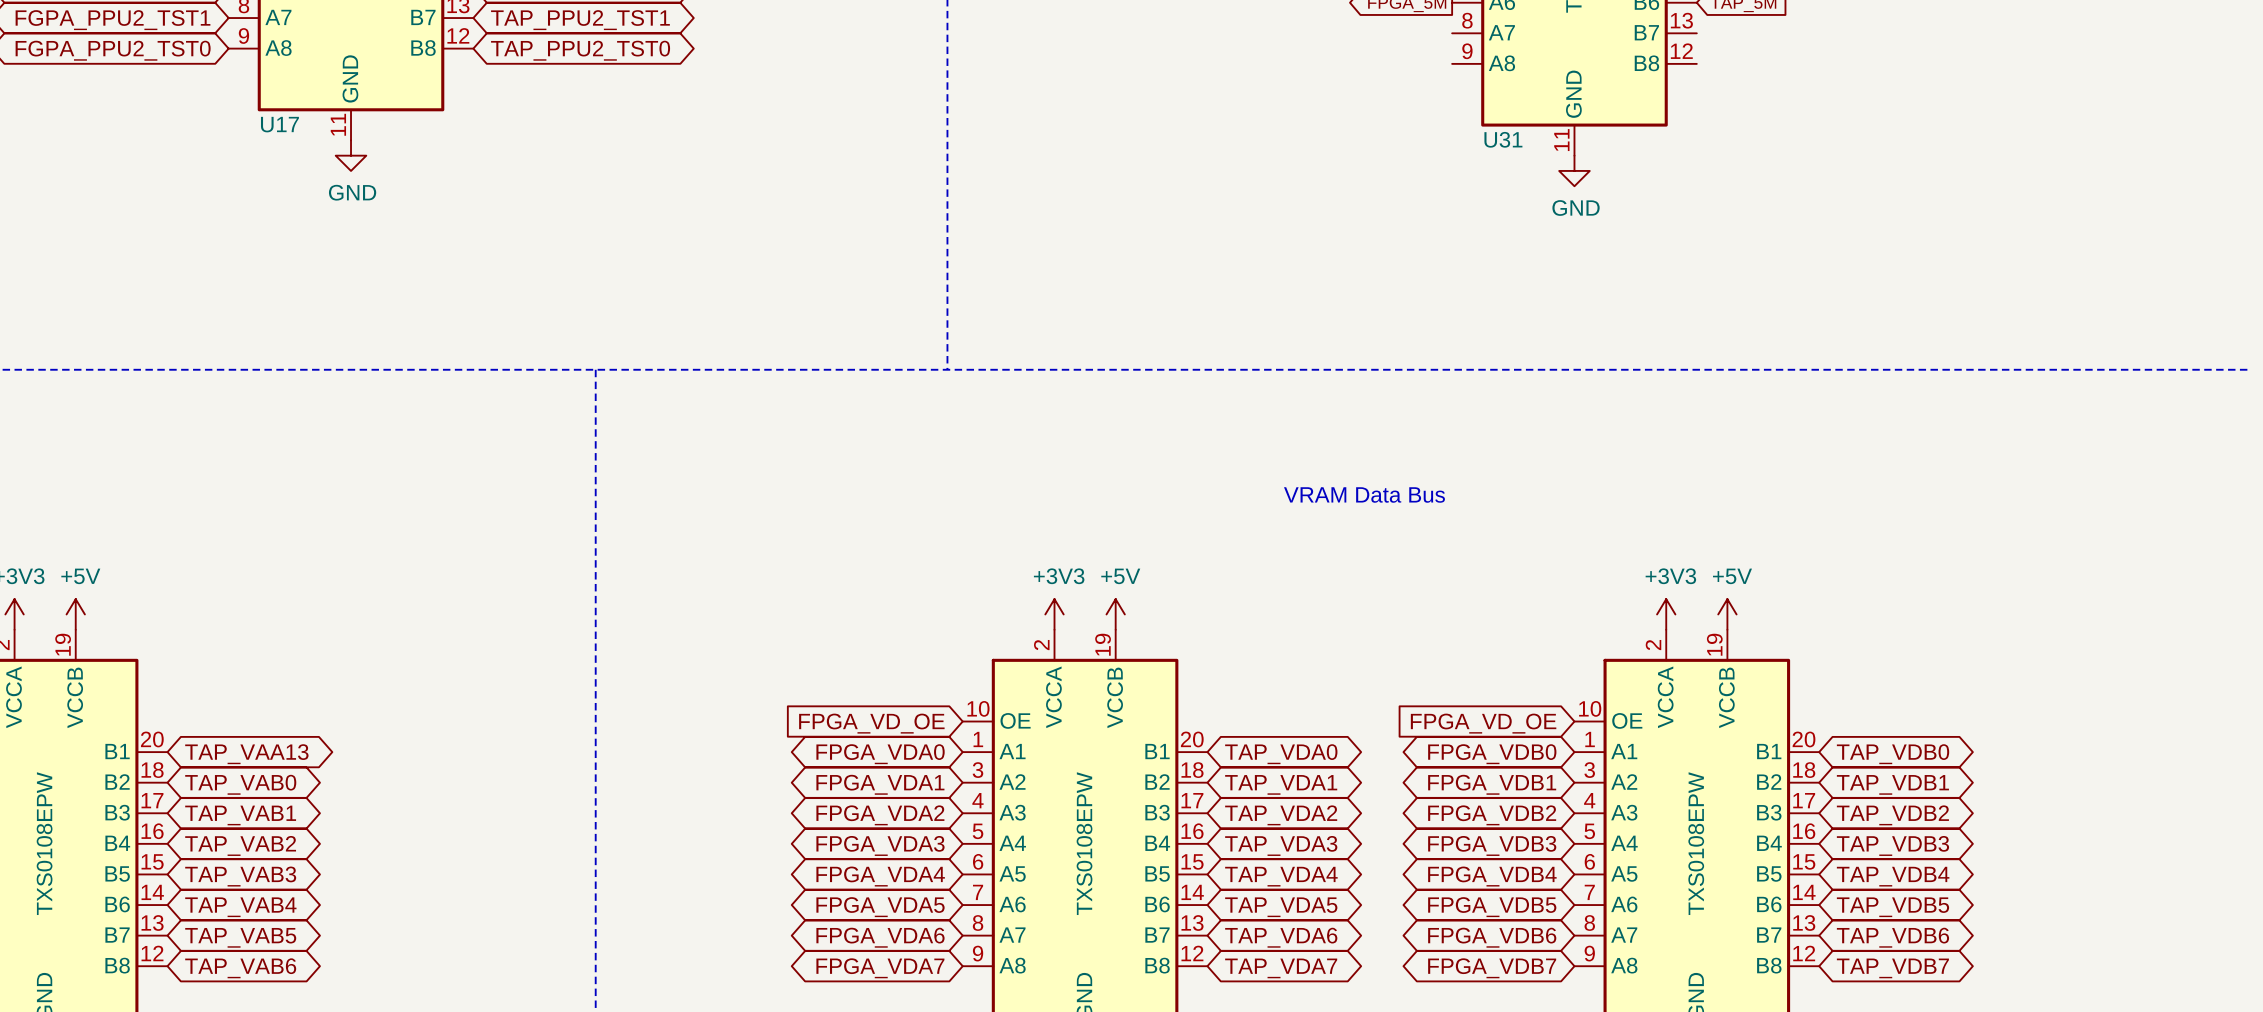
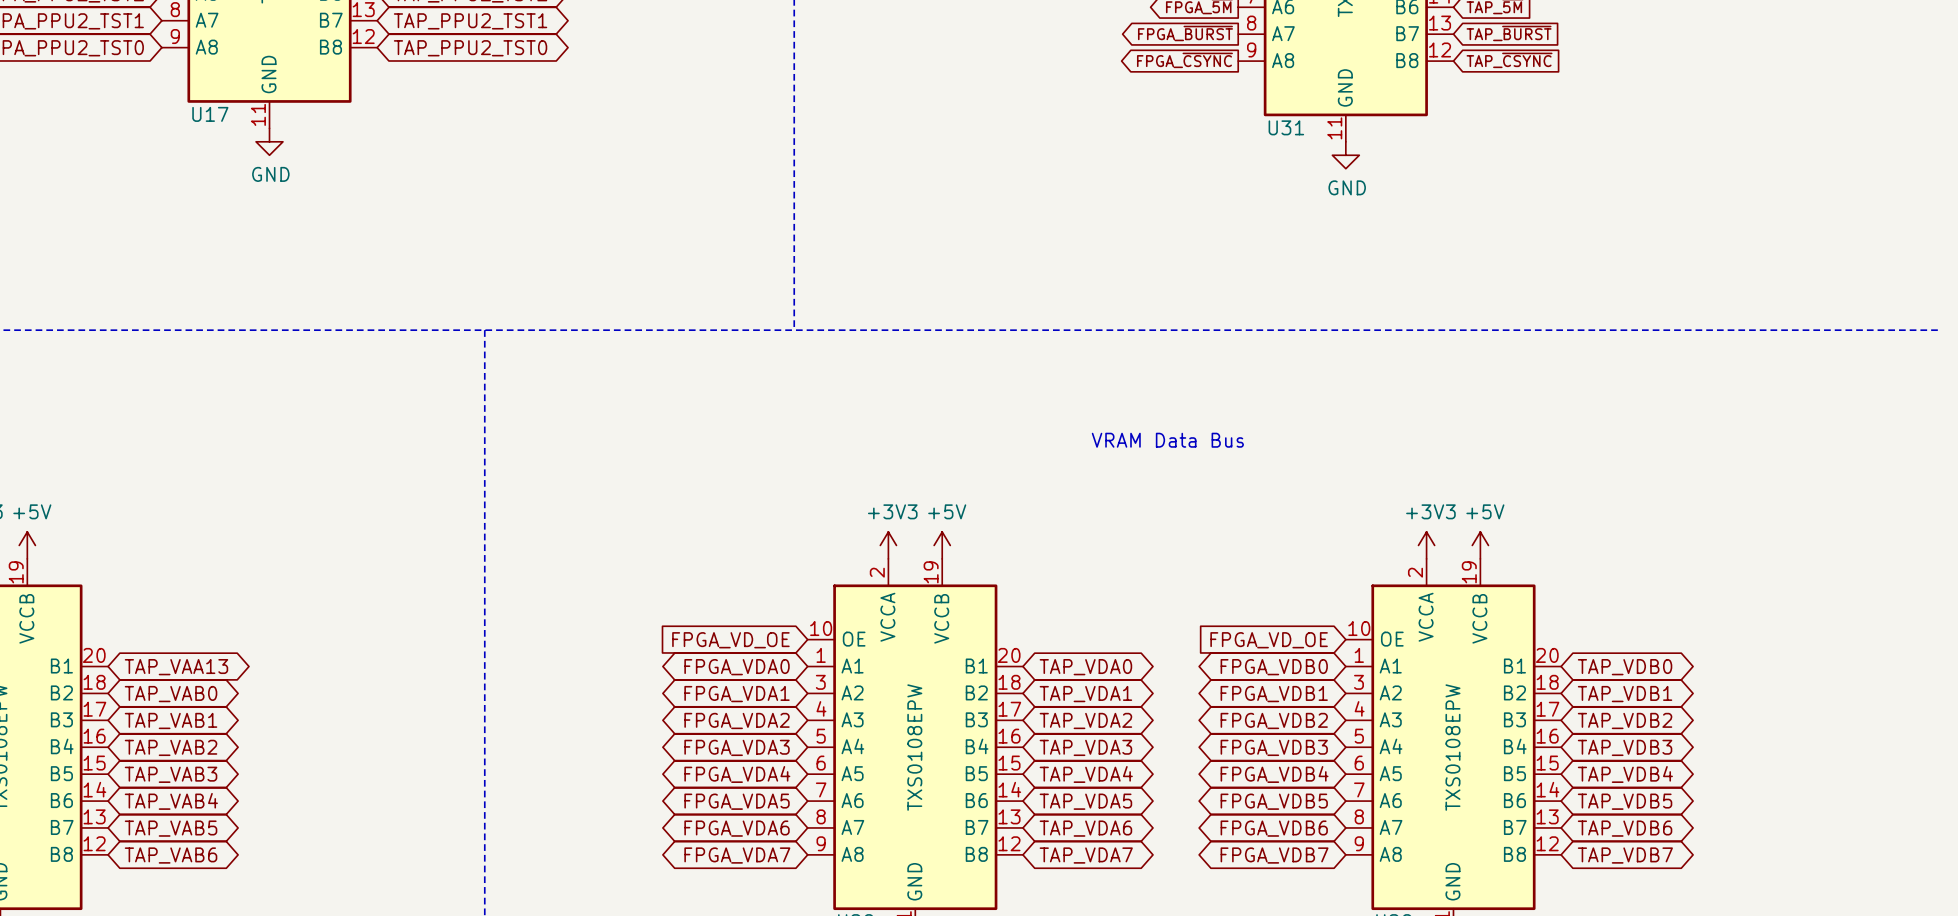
global label: none -> FPGA_~{BURST} (1185, 33)
global label: none -> TAP_~{BURST} (1509, 33)
global label: none -> FPGA_~{CSYNC} (1184, 60)
global label: none -> TAP_~{CSYNC} (1509, 60)

